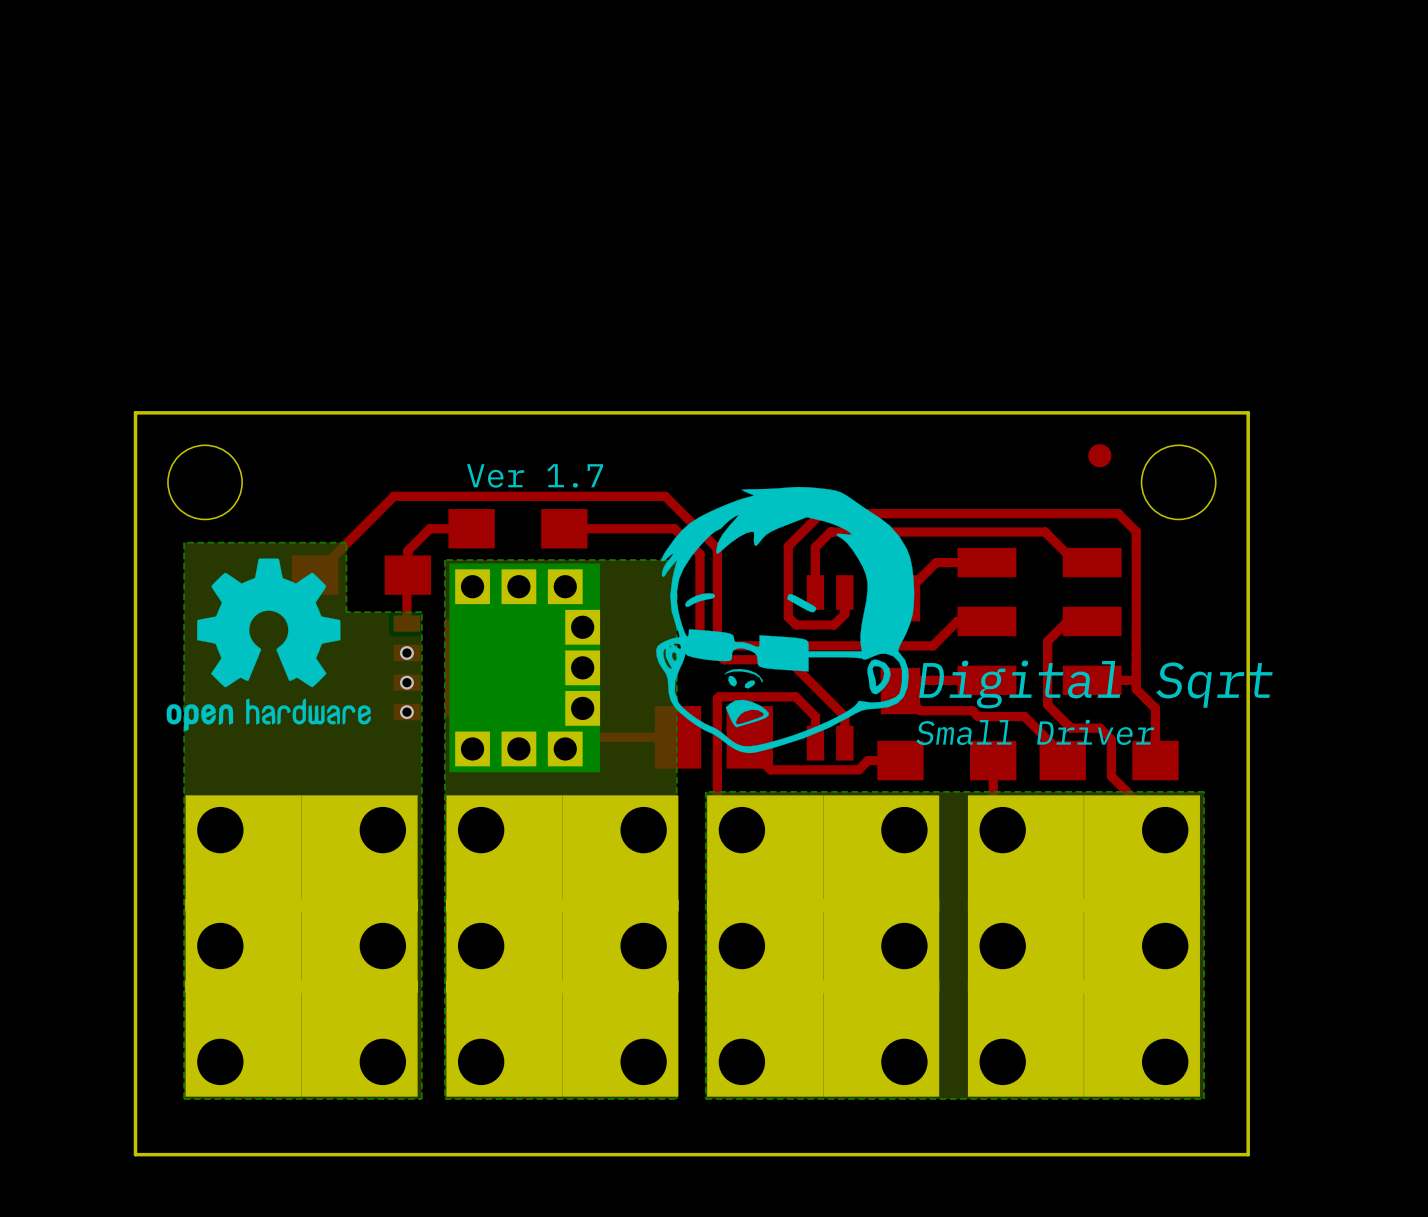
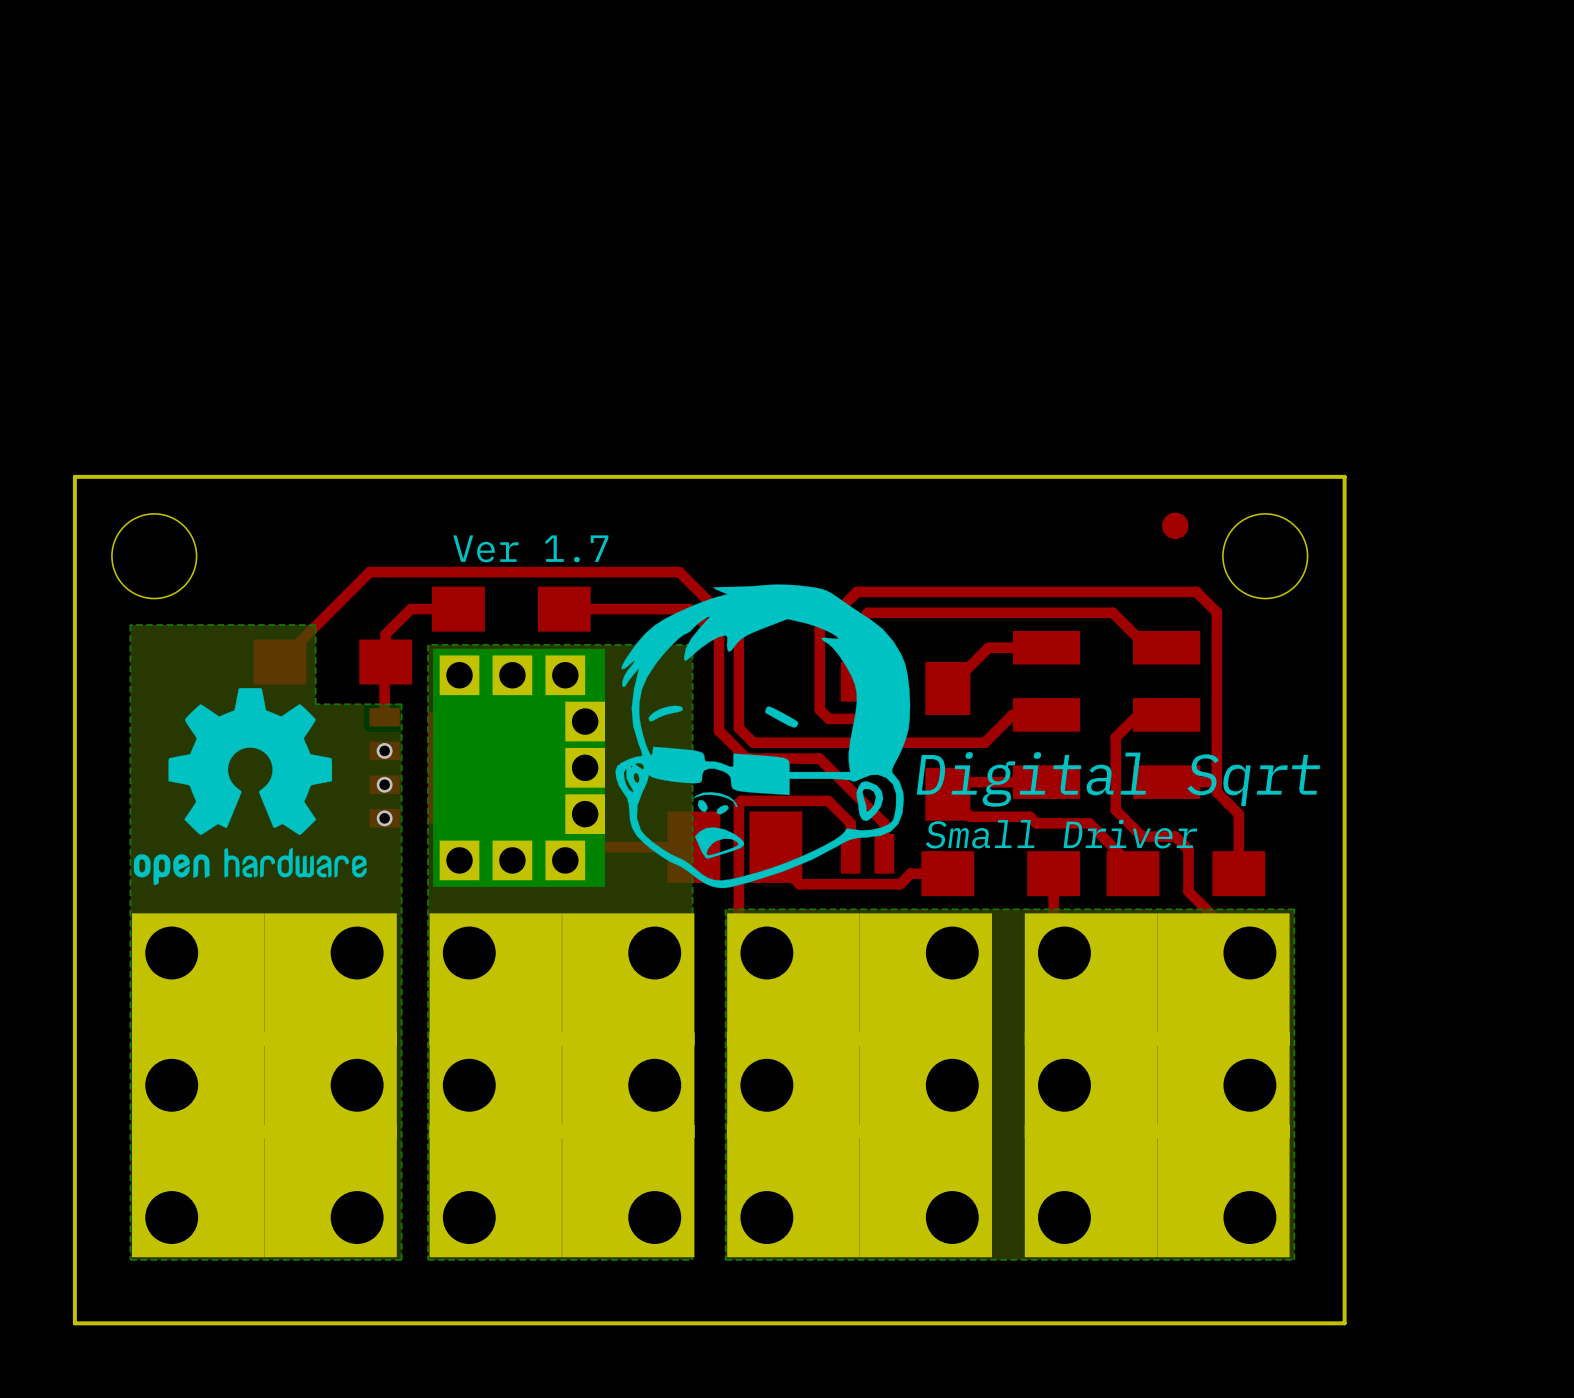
drawing position: (785, 620) -> (762, 736)
drawing position: (268, 644) -> (250, 786)
text position: Digital Sqrt (1095, 684) -> Digital Sqrt (1118, 779)
text position: Small Driver (1035, 732) -> Small Driver (1061, 834)

